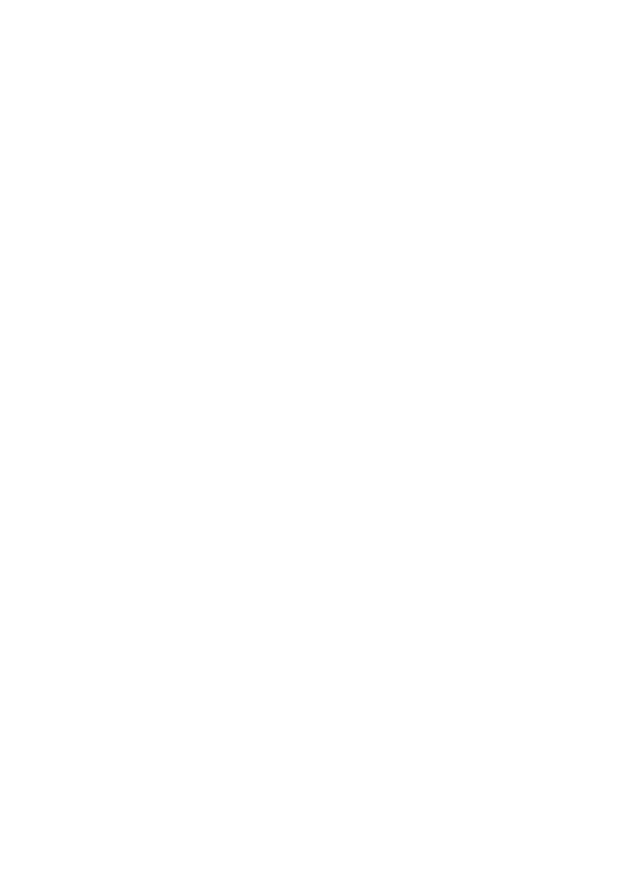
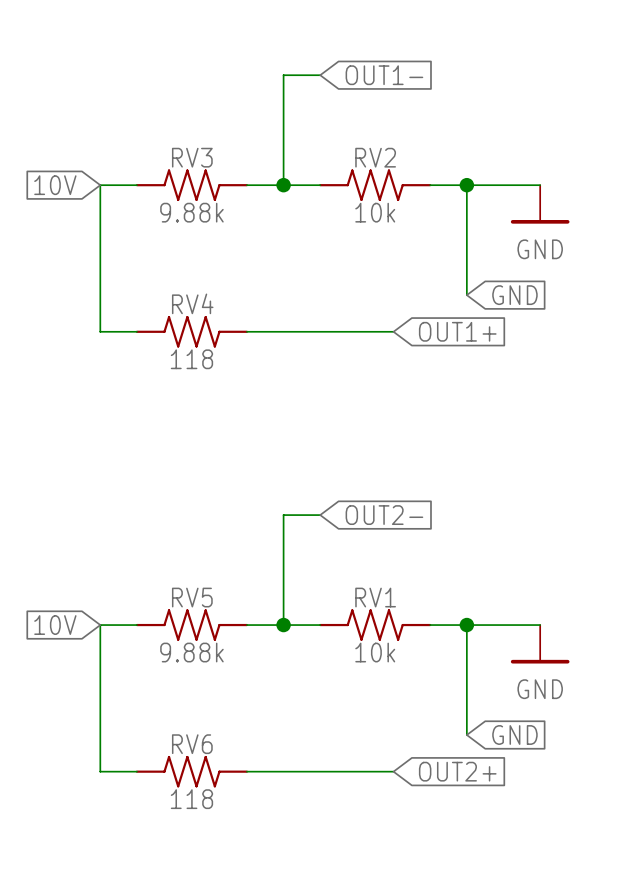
wire: none -> (320, 75) (283, 75) (283, 185)
global label: none -> OUT1- (384, 75)
global label: none -> 10V (55, 185)
wire: none -> (136, 185) (100, 185) (100, 331) (136, 331)
RV3: none -> 9.88k (191, 185)
wire: none -> (246, 185) (320, 185)
junction: none -> (283, 185)
RV2: none -> 10k (375, 185)
wire: none -> (430, 185) (540, 185)
wire: none -> (466, 185) (466, 295)
junction: none -> (466, 185)
power symbol: none -> GND (540, 204)
global label: none -> GND (514, 295)
RV4: none -> 118 (191, 331)
wire: none -> (246, 331) (393, 331)
global label: none -> OUT1+ (457, 331)
wire: none -> (320, 515) (283, 515) (283, 625)
global label: none -> OUT2- (384, 515)
global label: none -> 10V (55, 625)
wire: none -> (136, 625) (100, 625) (100, 771) (136, 771)
RV5: none -> 9.88k (191, 625)
wire: none -> (246, 625) (320, 625)
junction: none -> (283, 625)
RV1: none -> 10k (375, 625)
wire: none -> (430, 625) (540, 625)
wire: none -> (466, 625) (466, 735)
junction: none -> (466, 625)
power symbol: none -> GND (540, 644)
global label: none -> GND (514, 735)
RV6: none -> 118 (191, 771)
wire: none -> (246, 771) (393, 771)
global label: none -> OUT2+ (457, 771)

